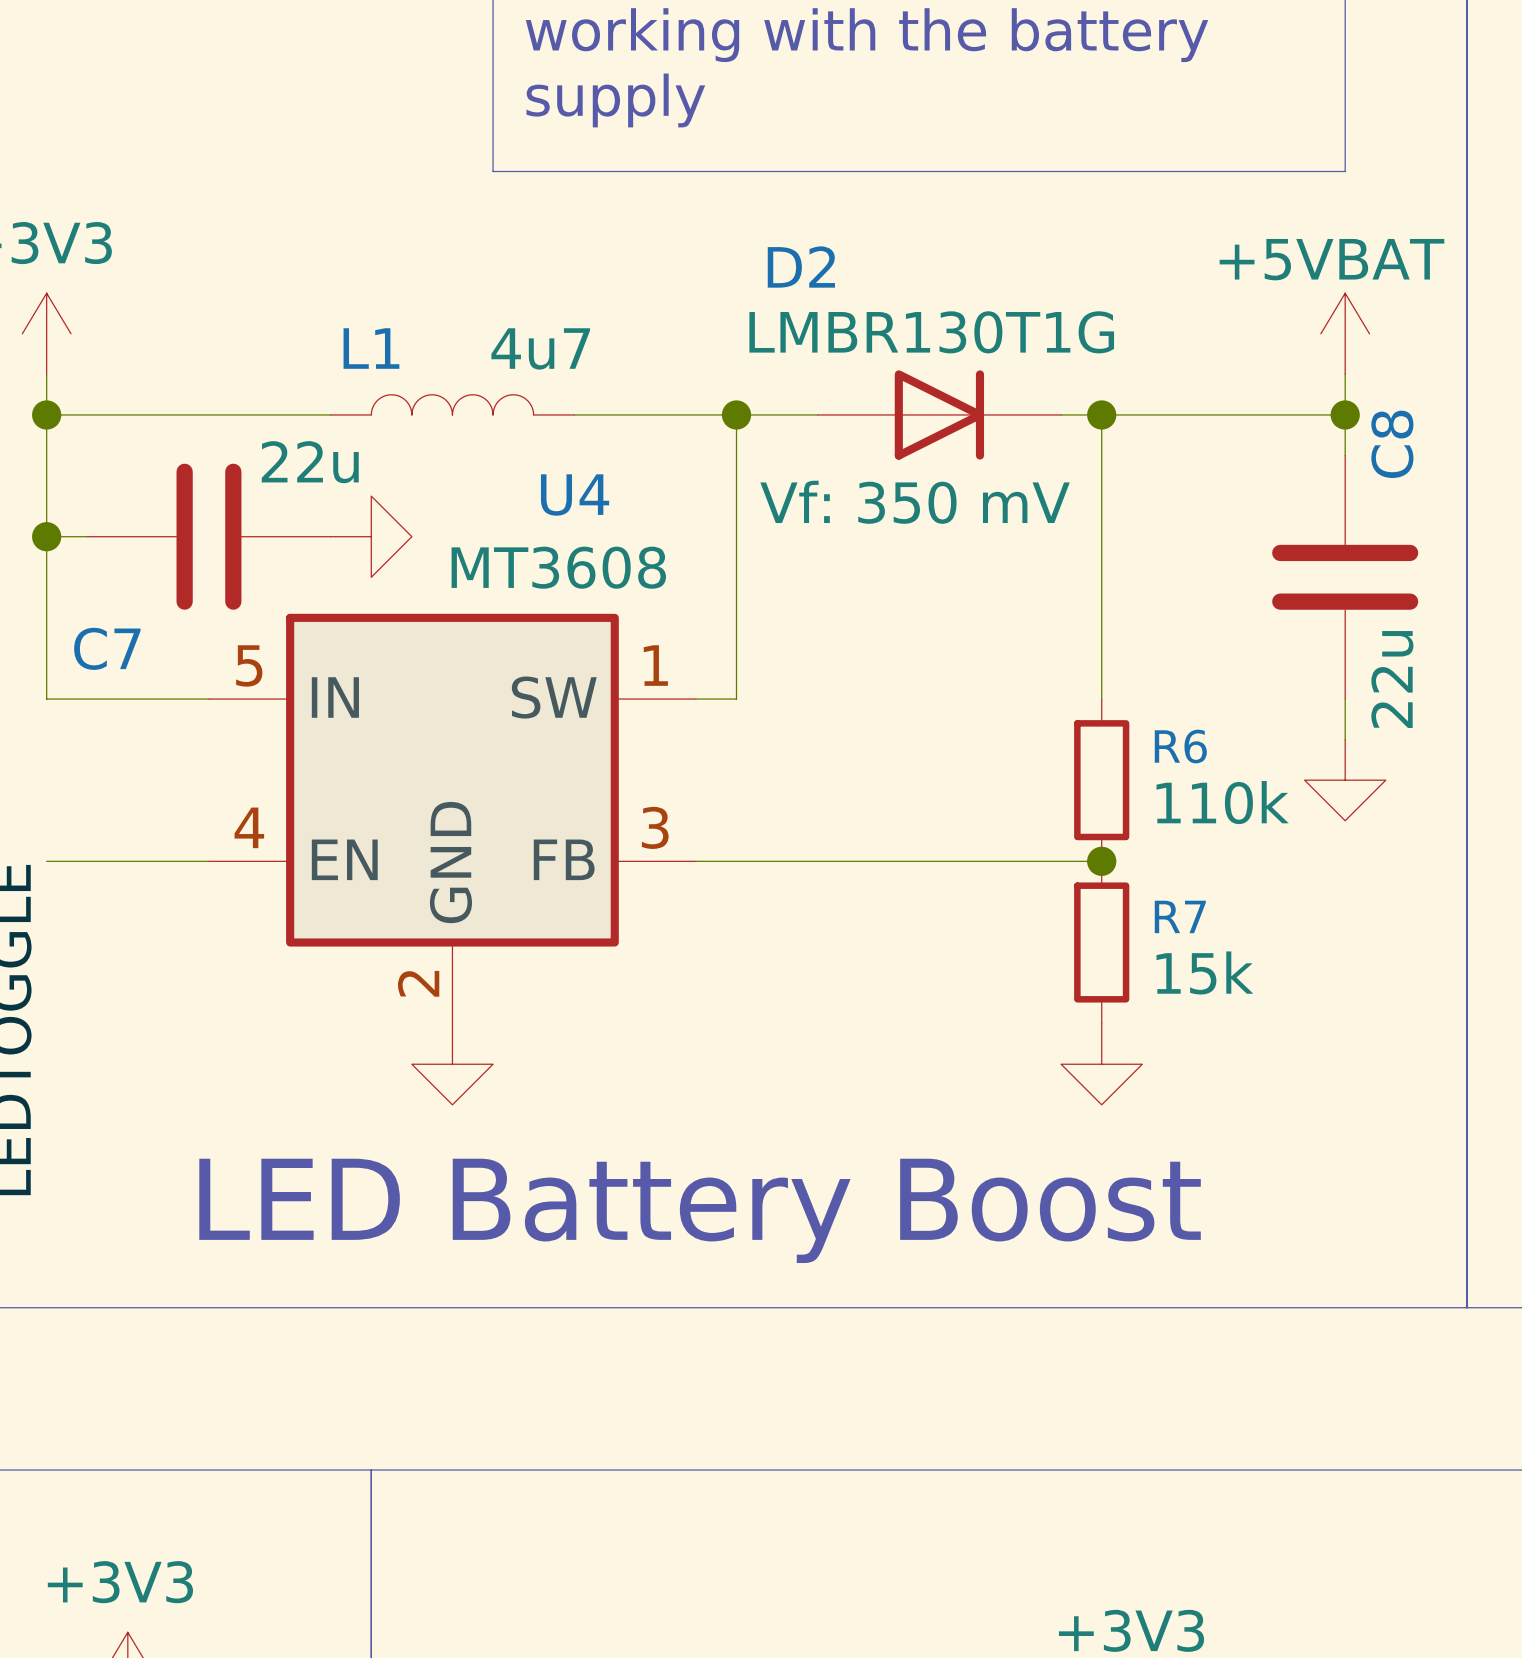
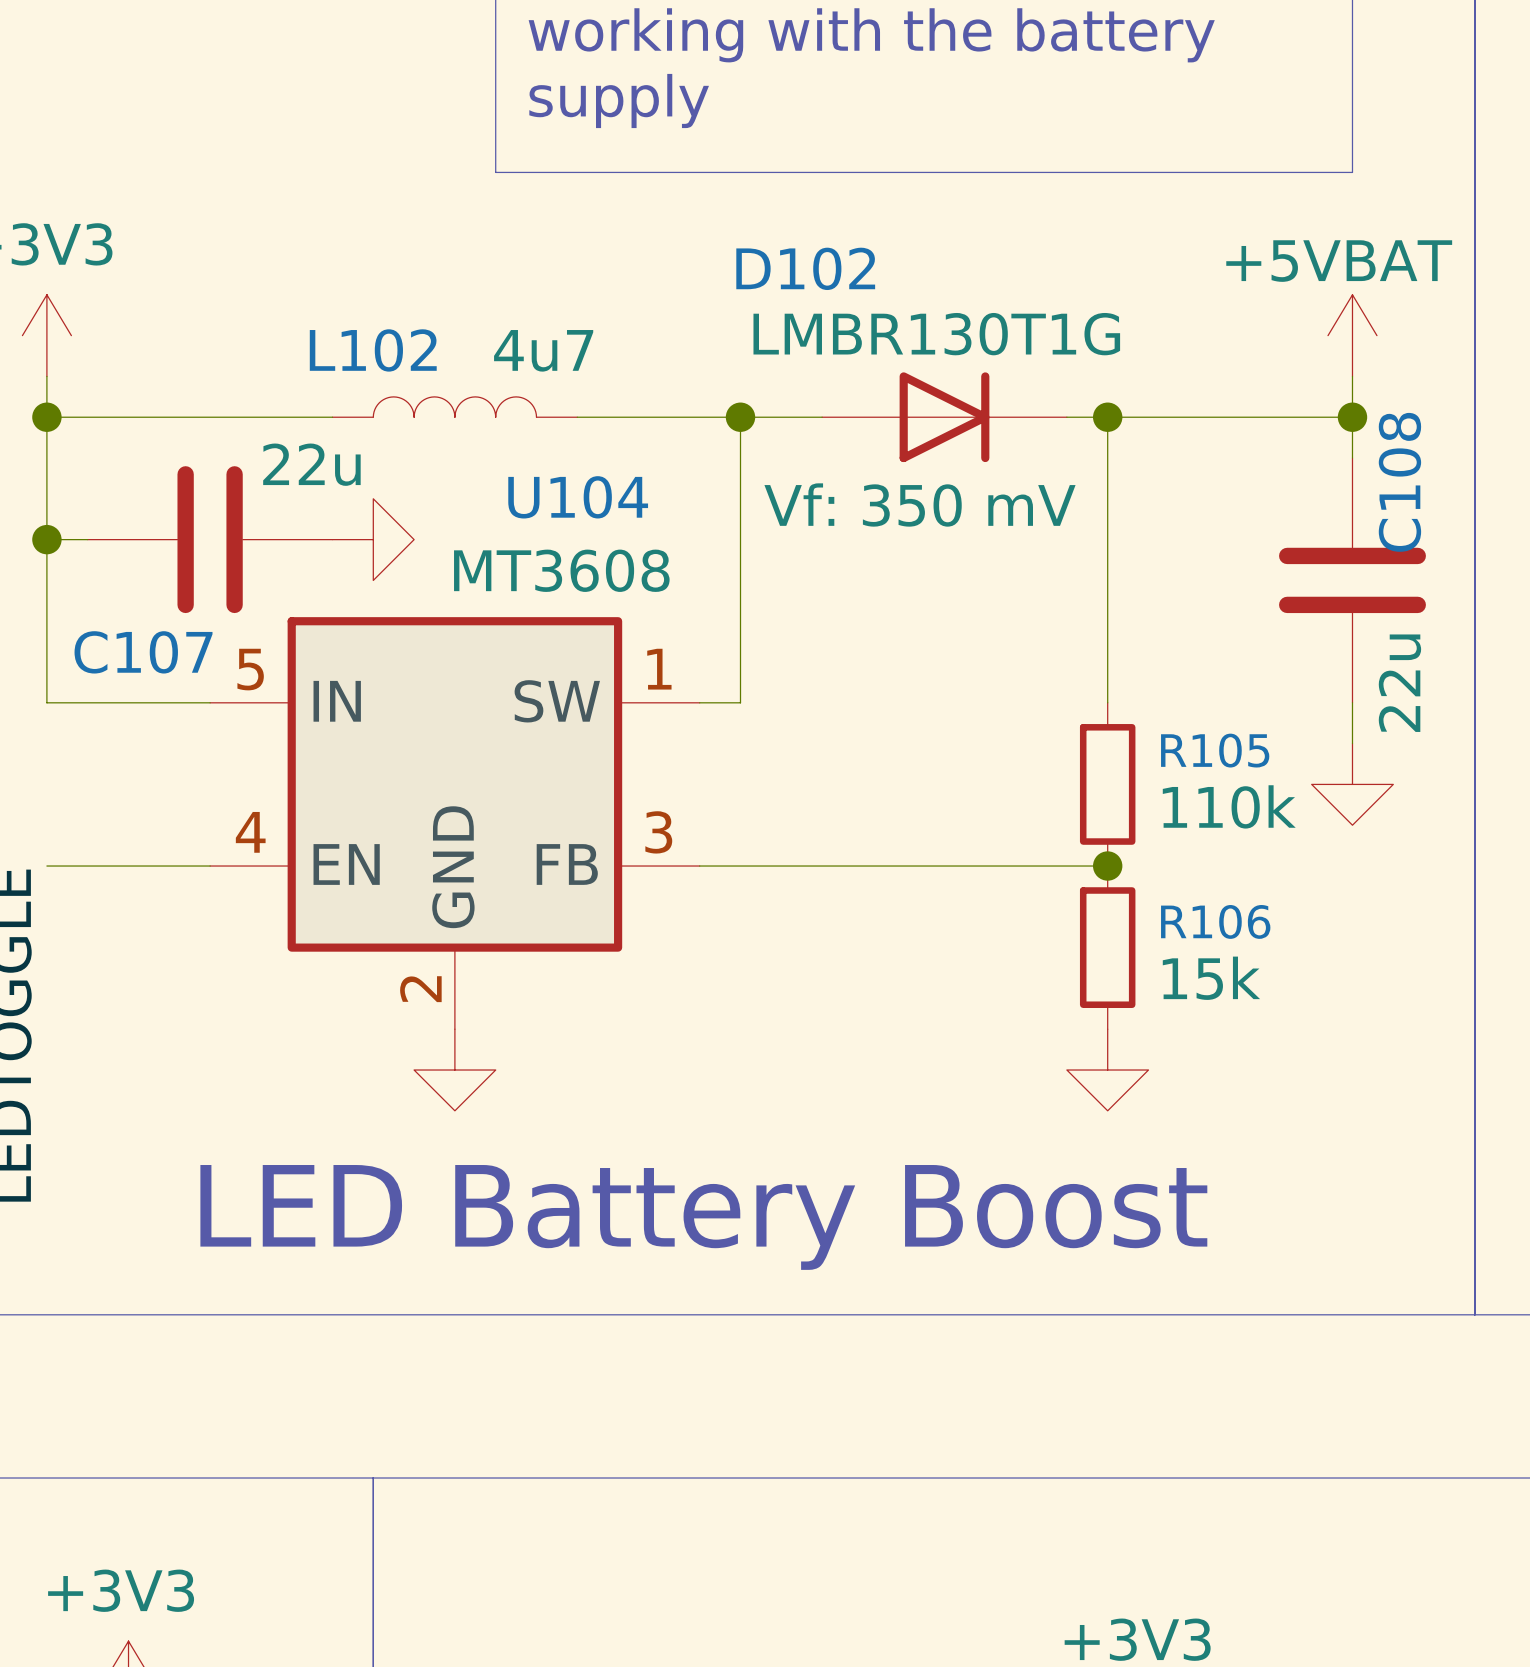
D2 name: D2 (801, 267) -> D102 (805, 268)
L1 name: L1 (371, 348) -> L102 (373, 350)
C8 name: C8 (1392, 444) -> C108 (1399, 482)
U4 name: U4 (575, 495) -> U104 (578, 497)
C7 name: C7 (107, 648) -> C107 (143, 652)
R6 name: R6 (1180, 746) -> R105 (1215, 750)
R7 name: R7 (1180, 916) -> R106 (1215, 921)

